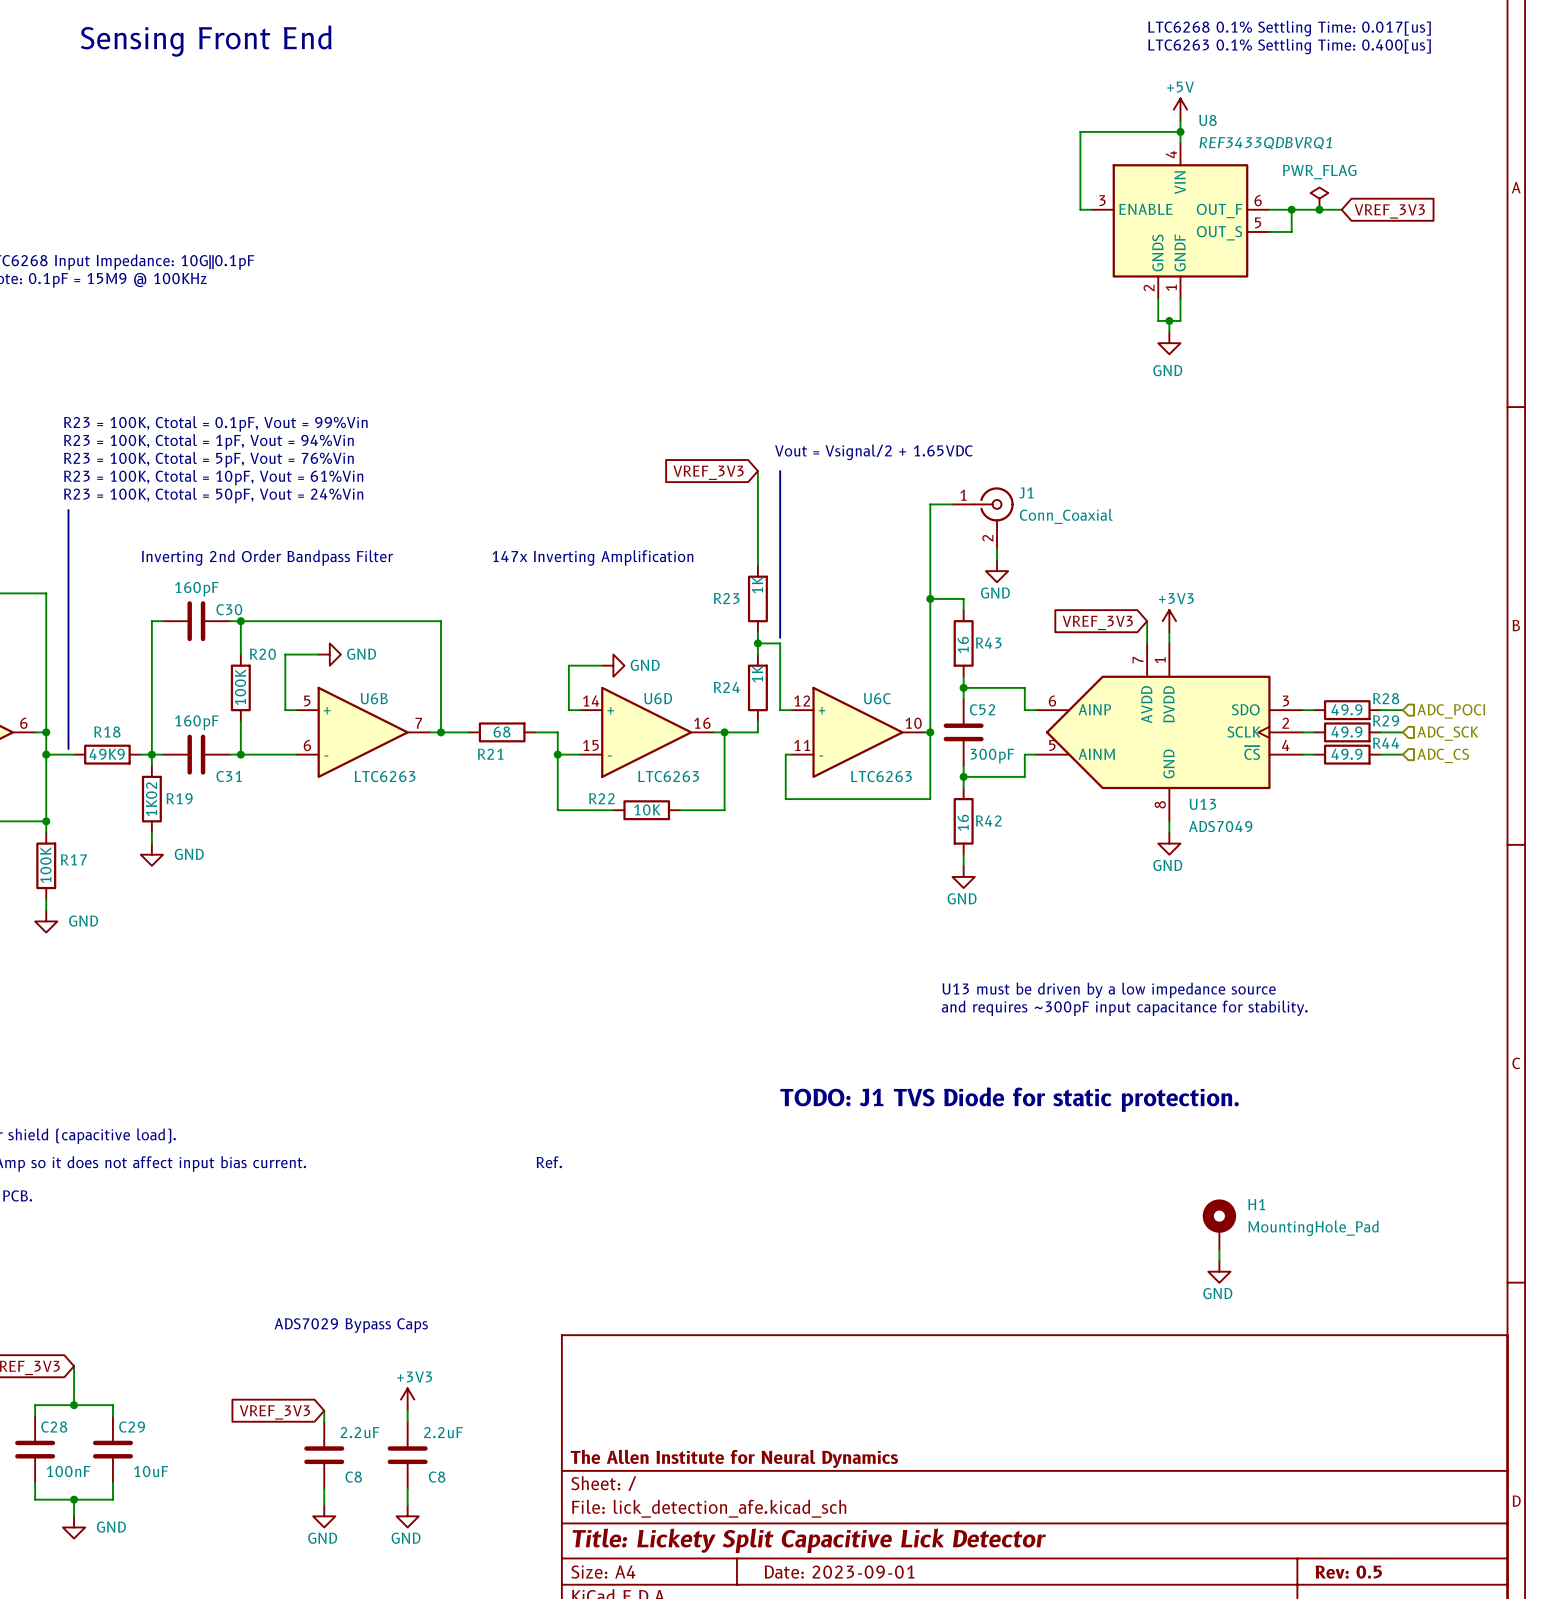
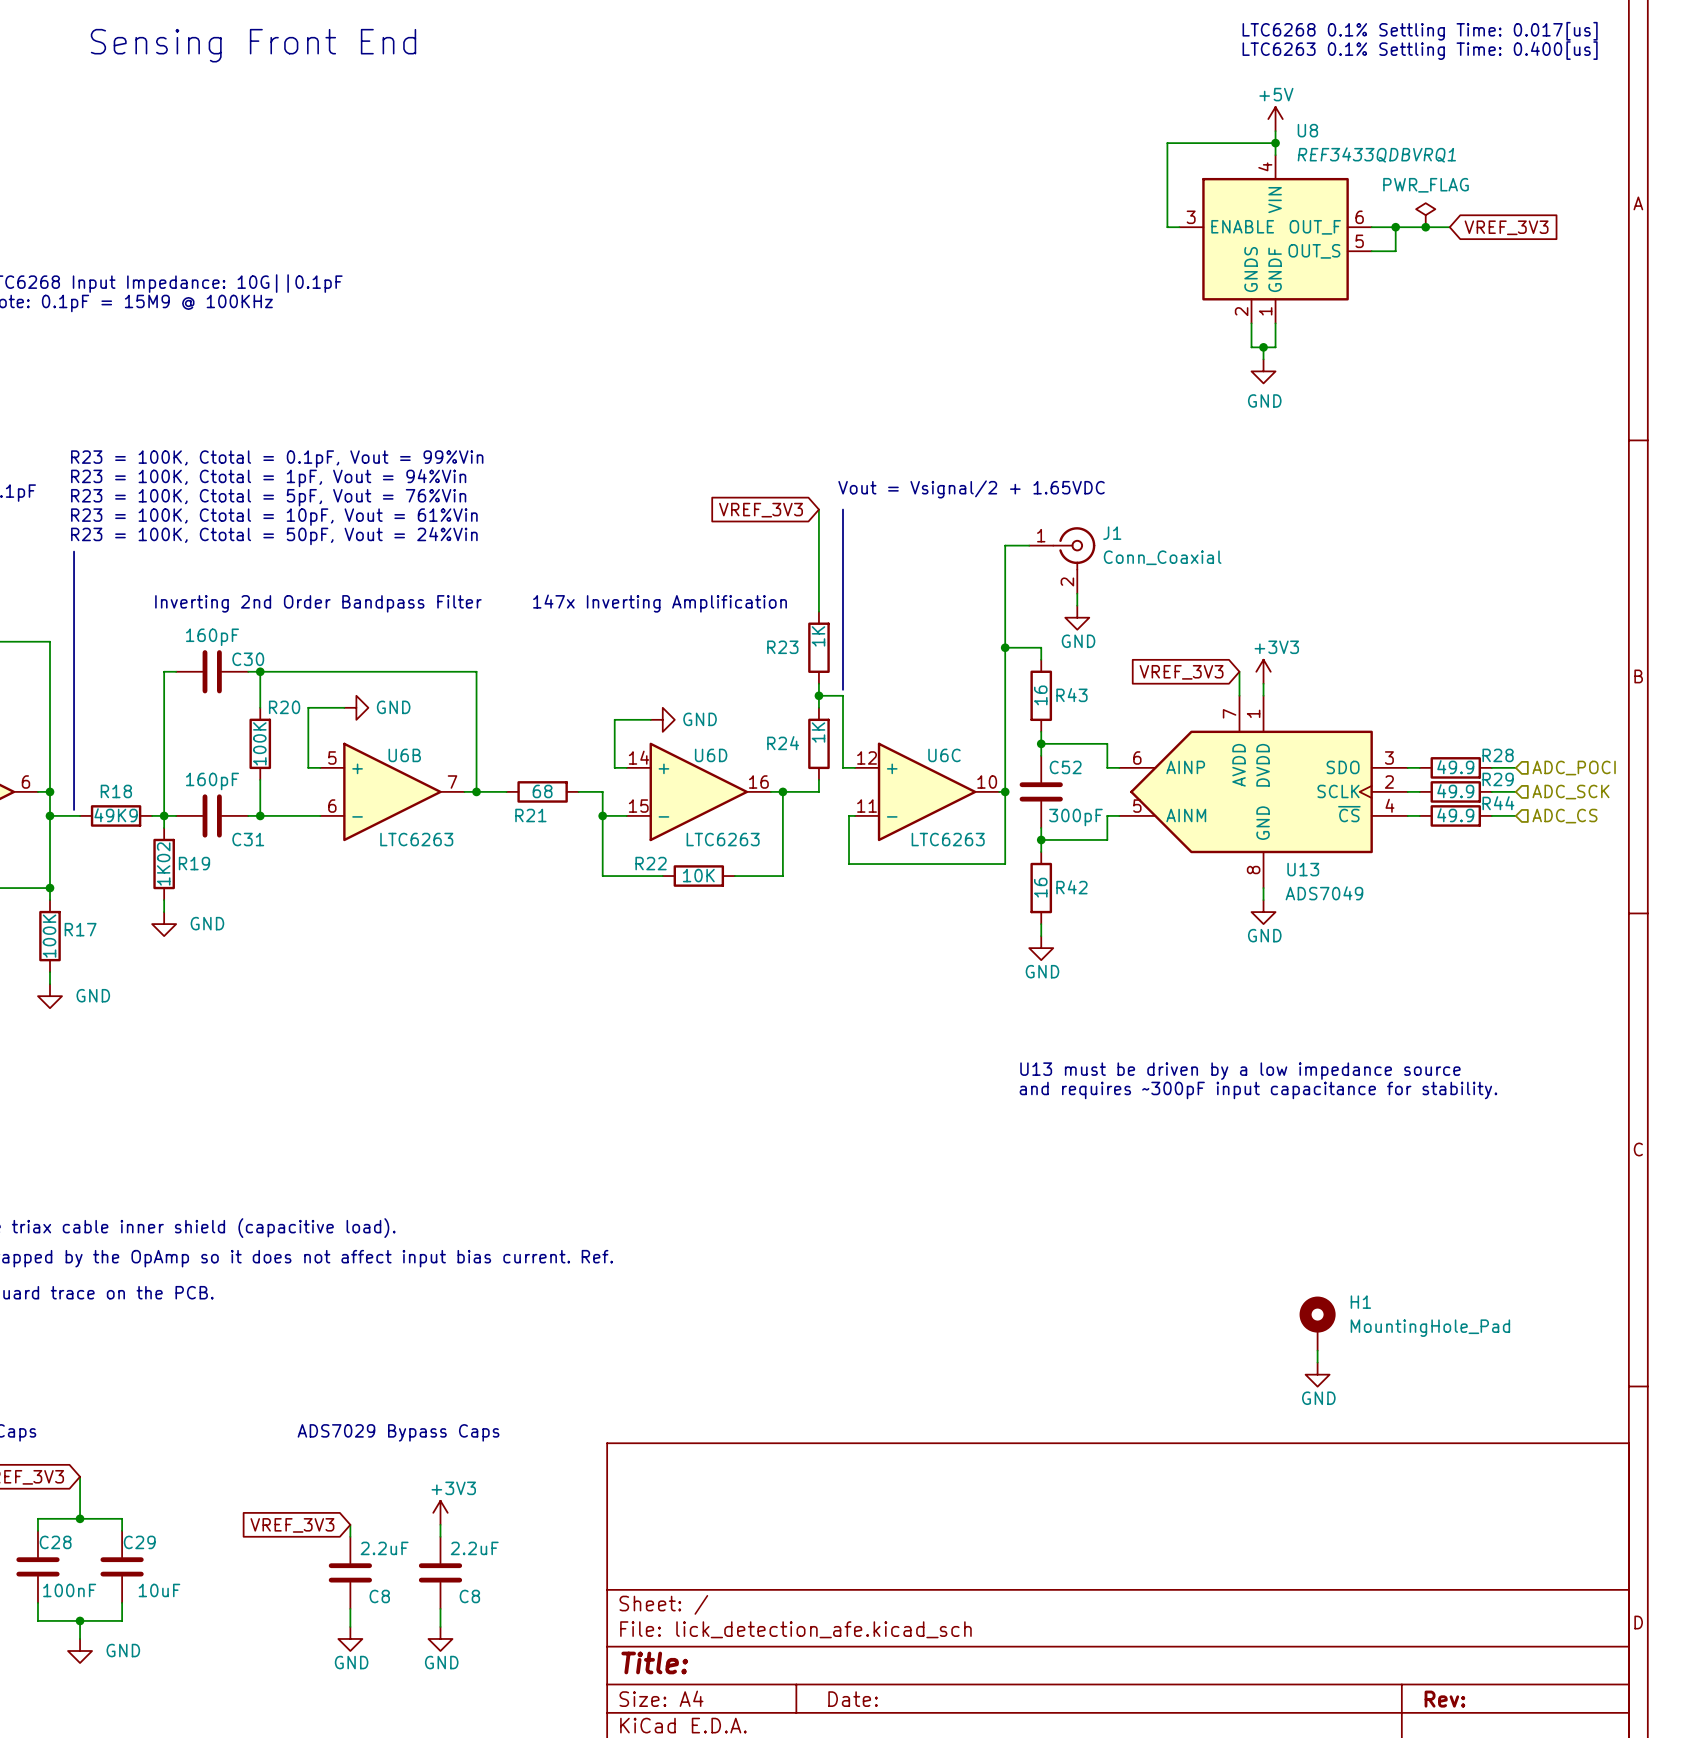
text: TODO: J1 TVS Diode for static protection. (1009, 1099) -> none
title block: The Allen Institute for Neural Dynamics (734, 1458) -> none
title block: Title: Lickety Split Capacitive Lick Detector (809, 1540) -> Title: (654, 1662)
title block: Date: 2023-09-01 (839, 1572) -> Date: (853, 1699)
title block: Rev: 0.5 (1348, 1572) -> Rev: (1444, 1699)

